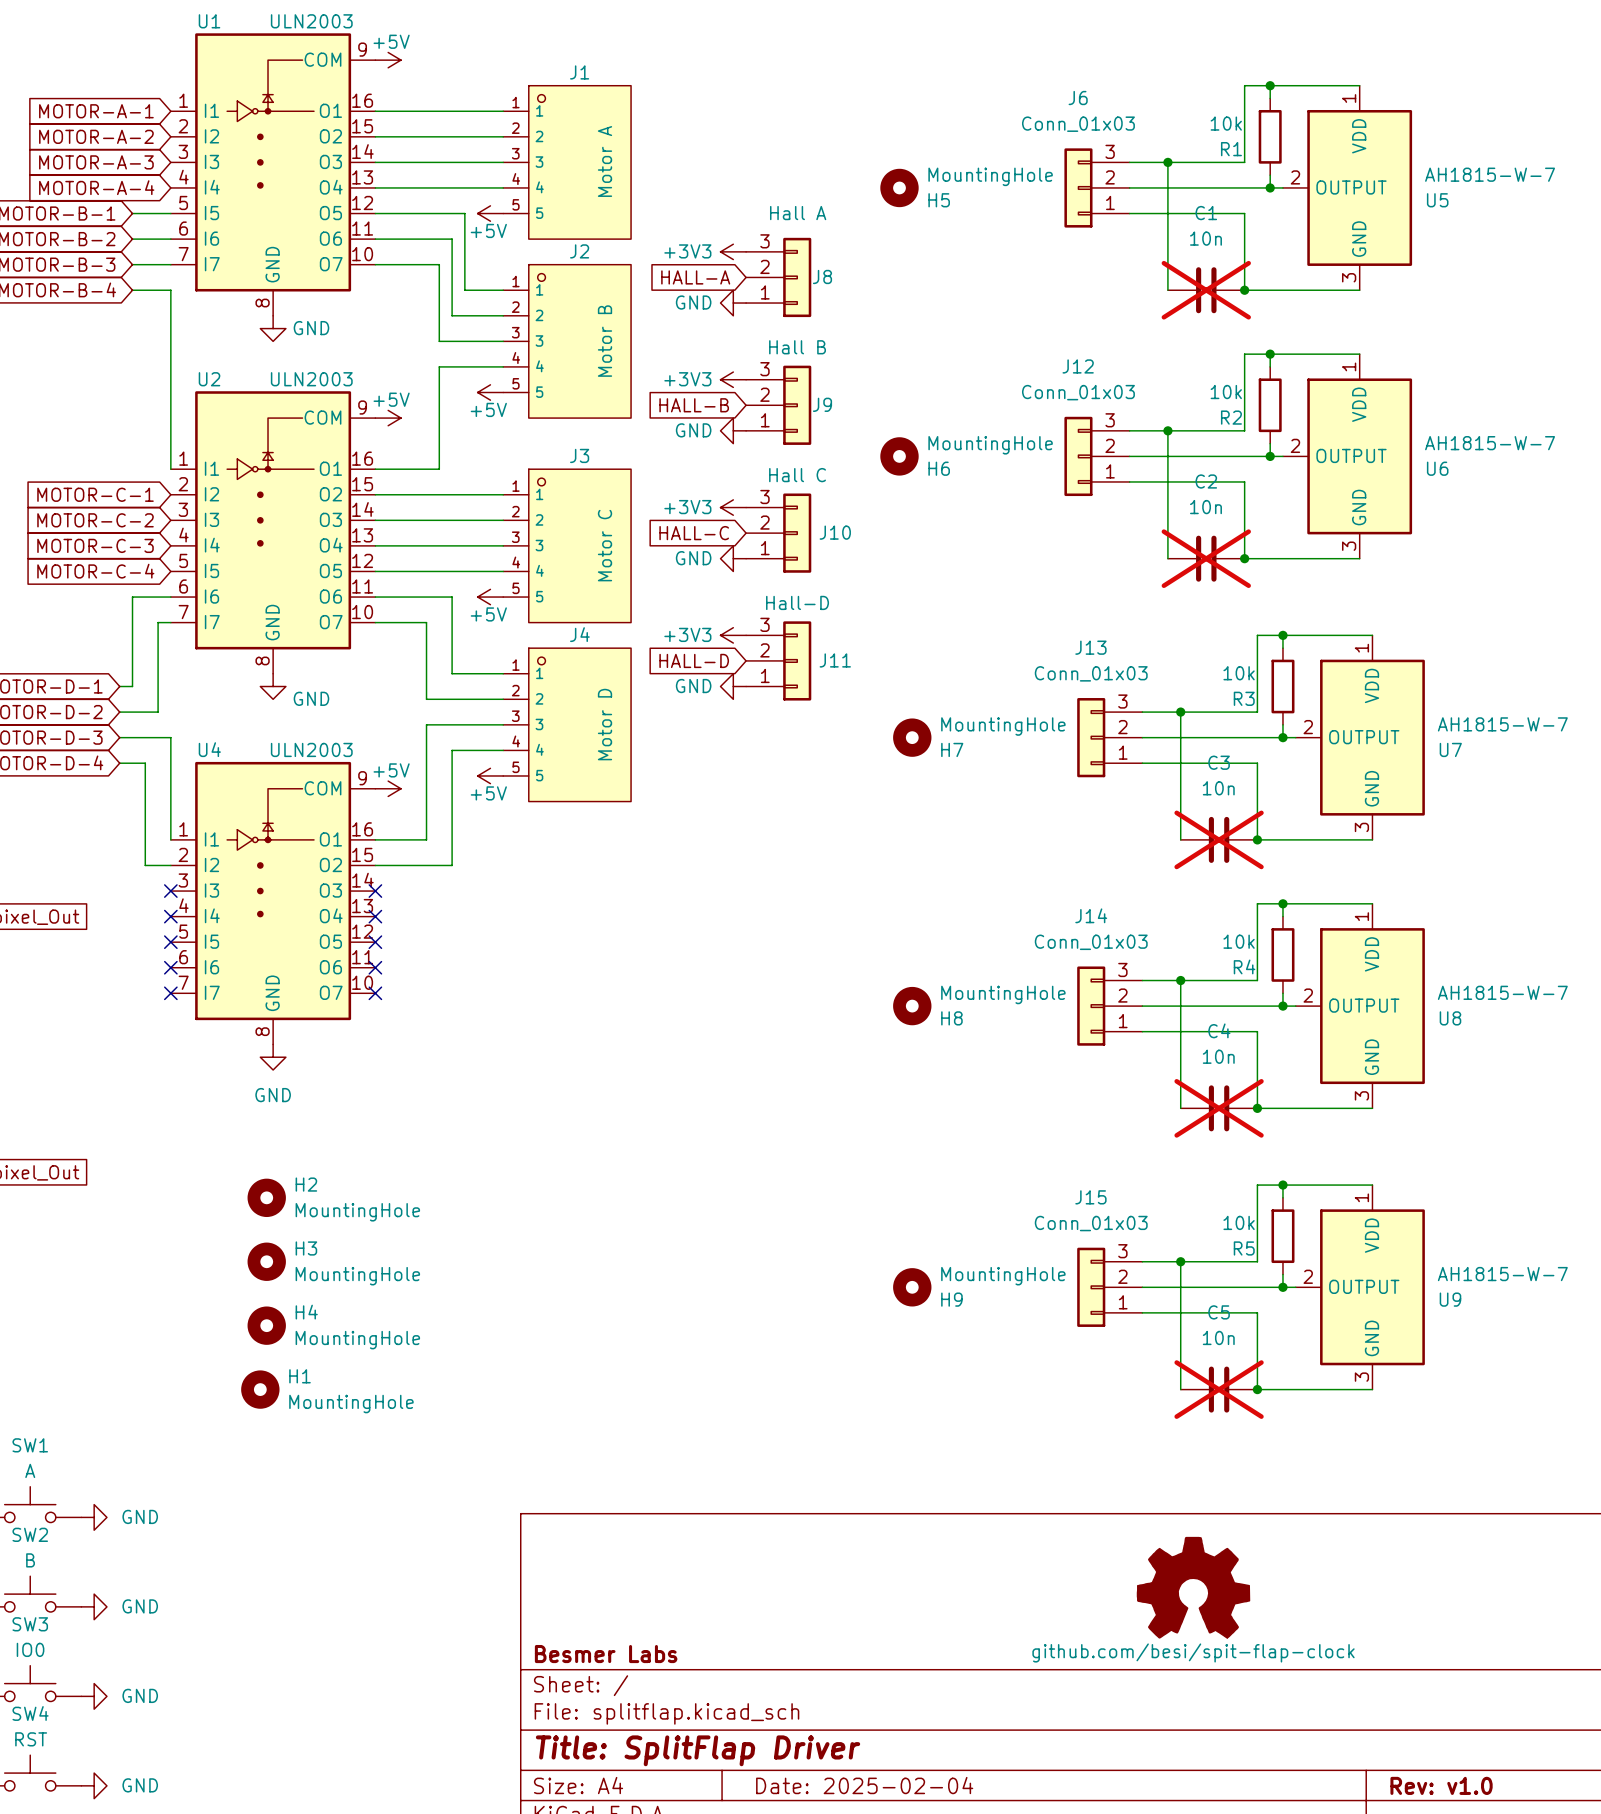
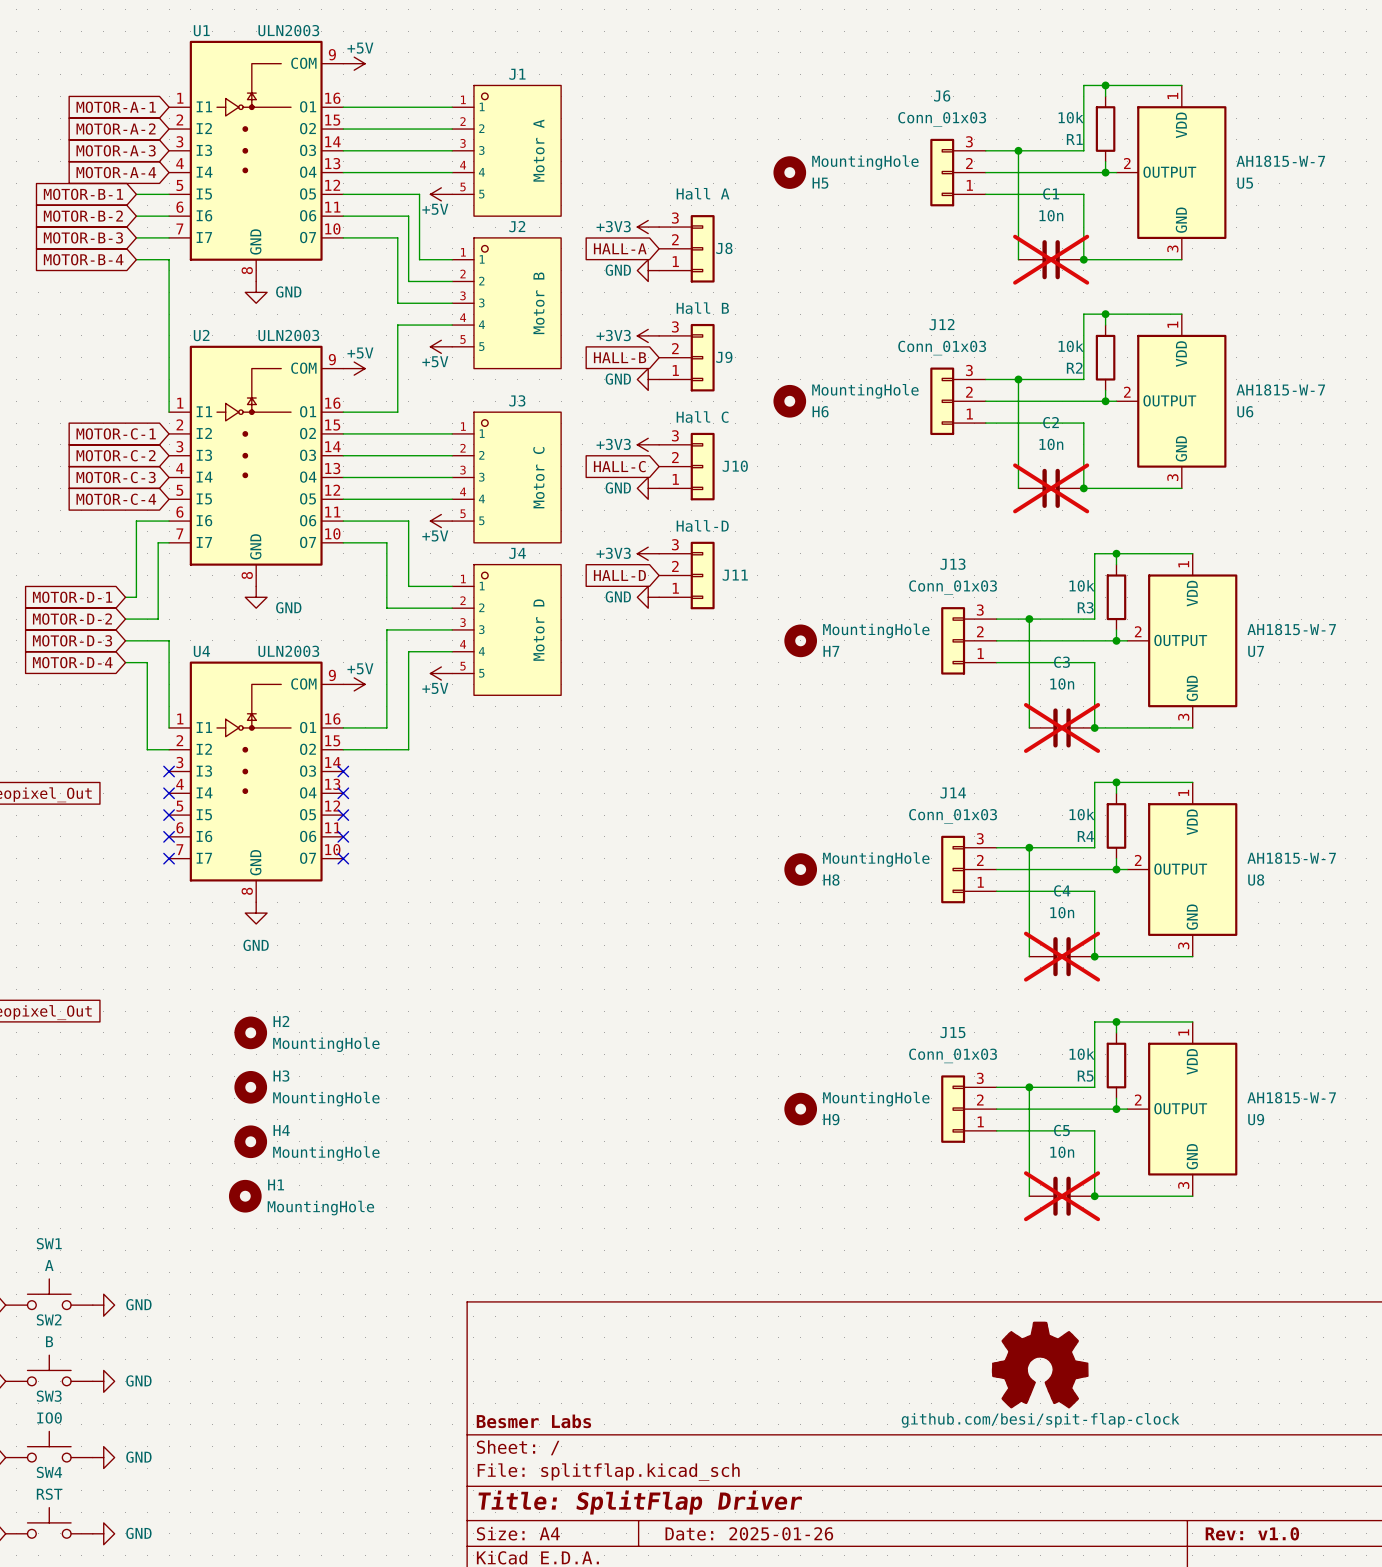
title block: Date: 2025-02-04 (864, 1785) -> Date: 2025-01-26 (749, 1533)

